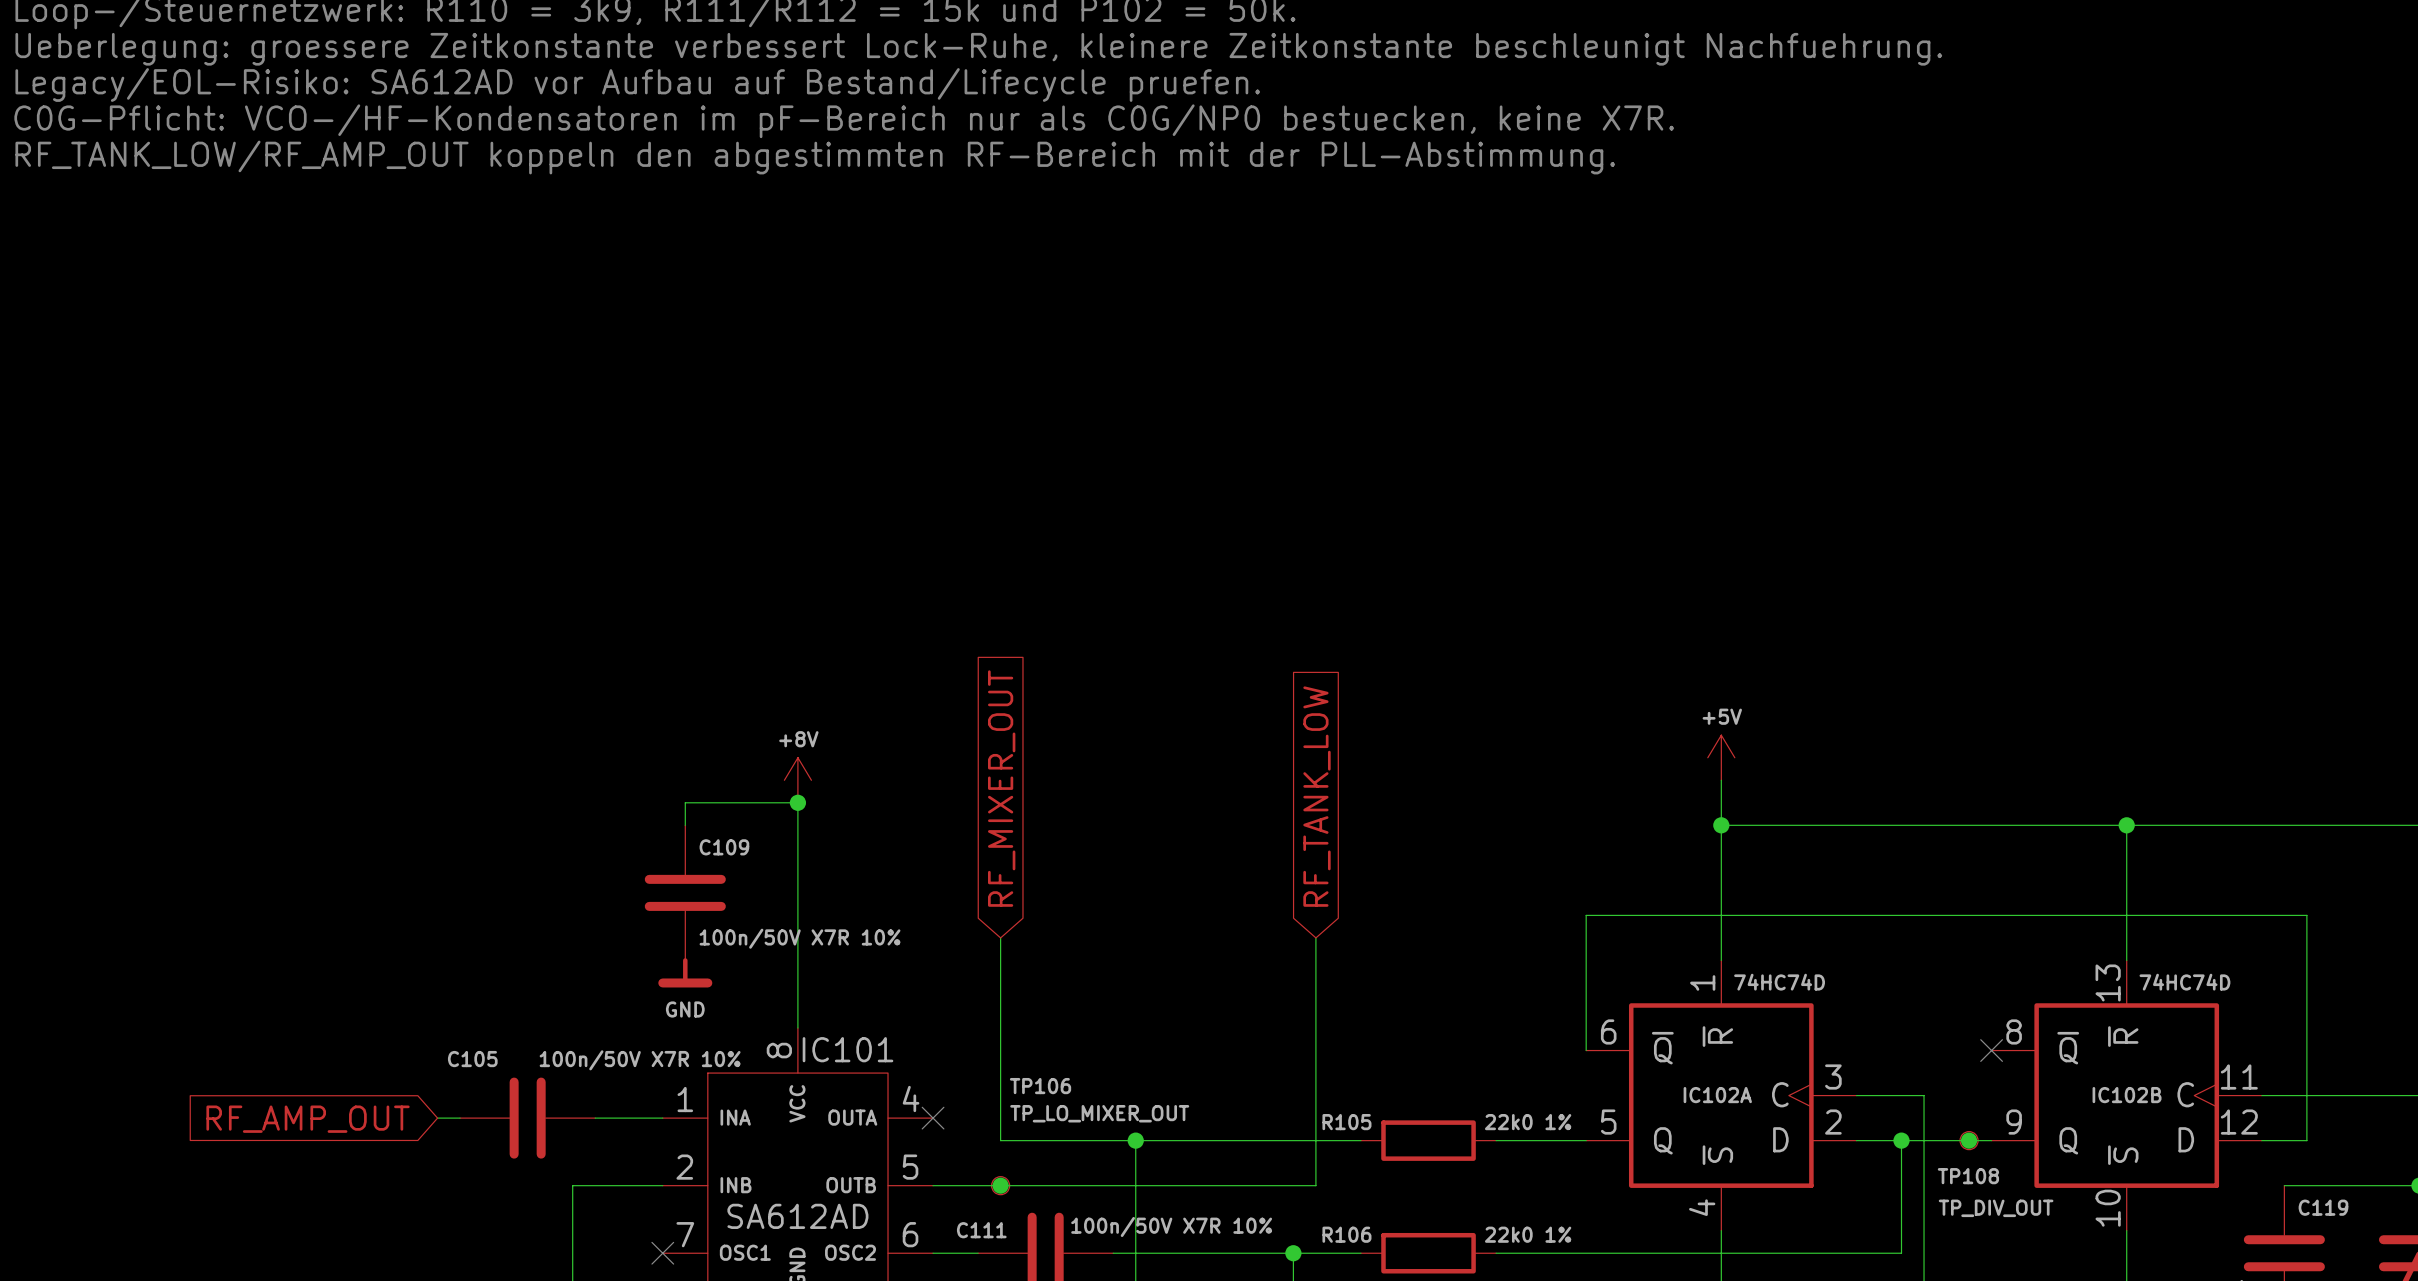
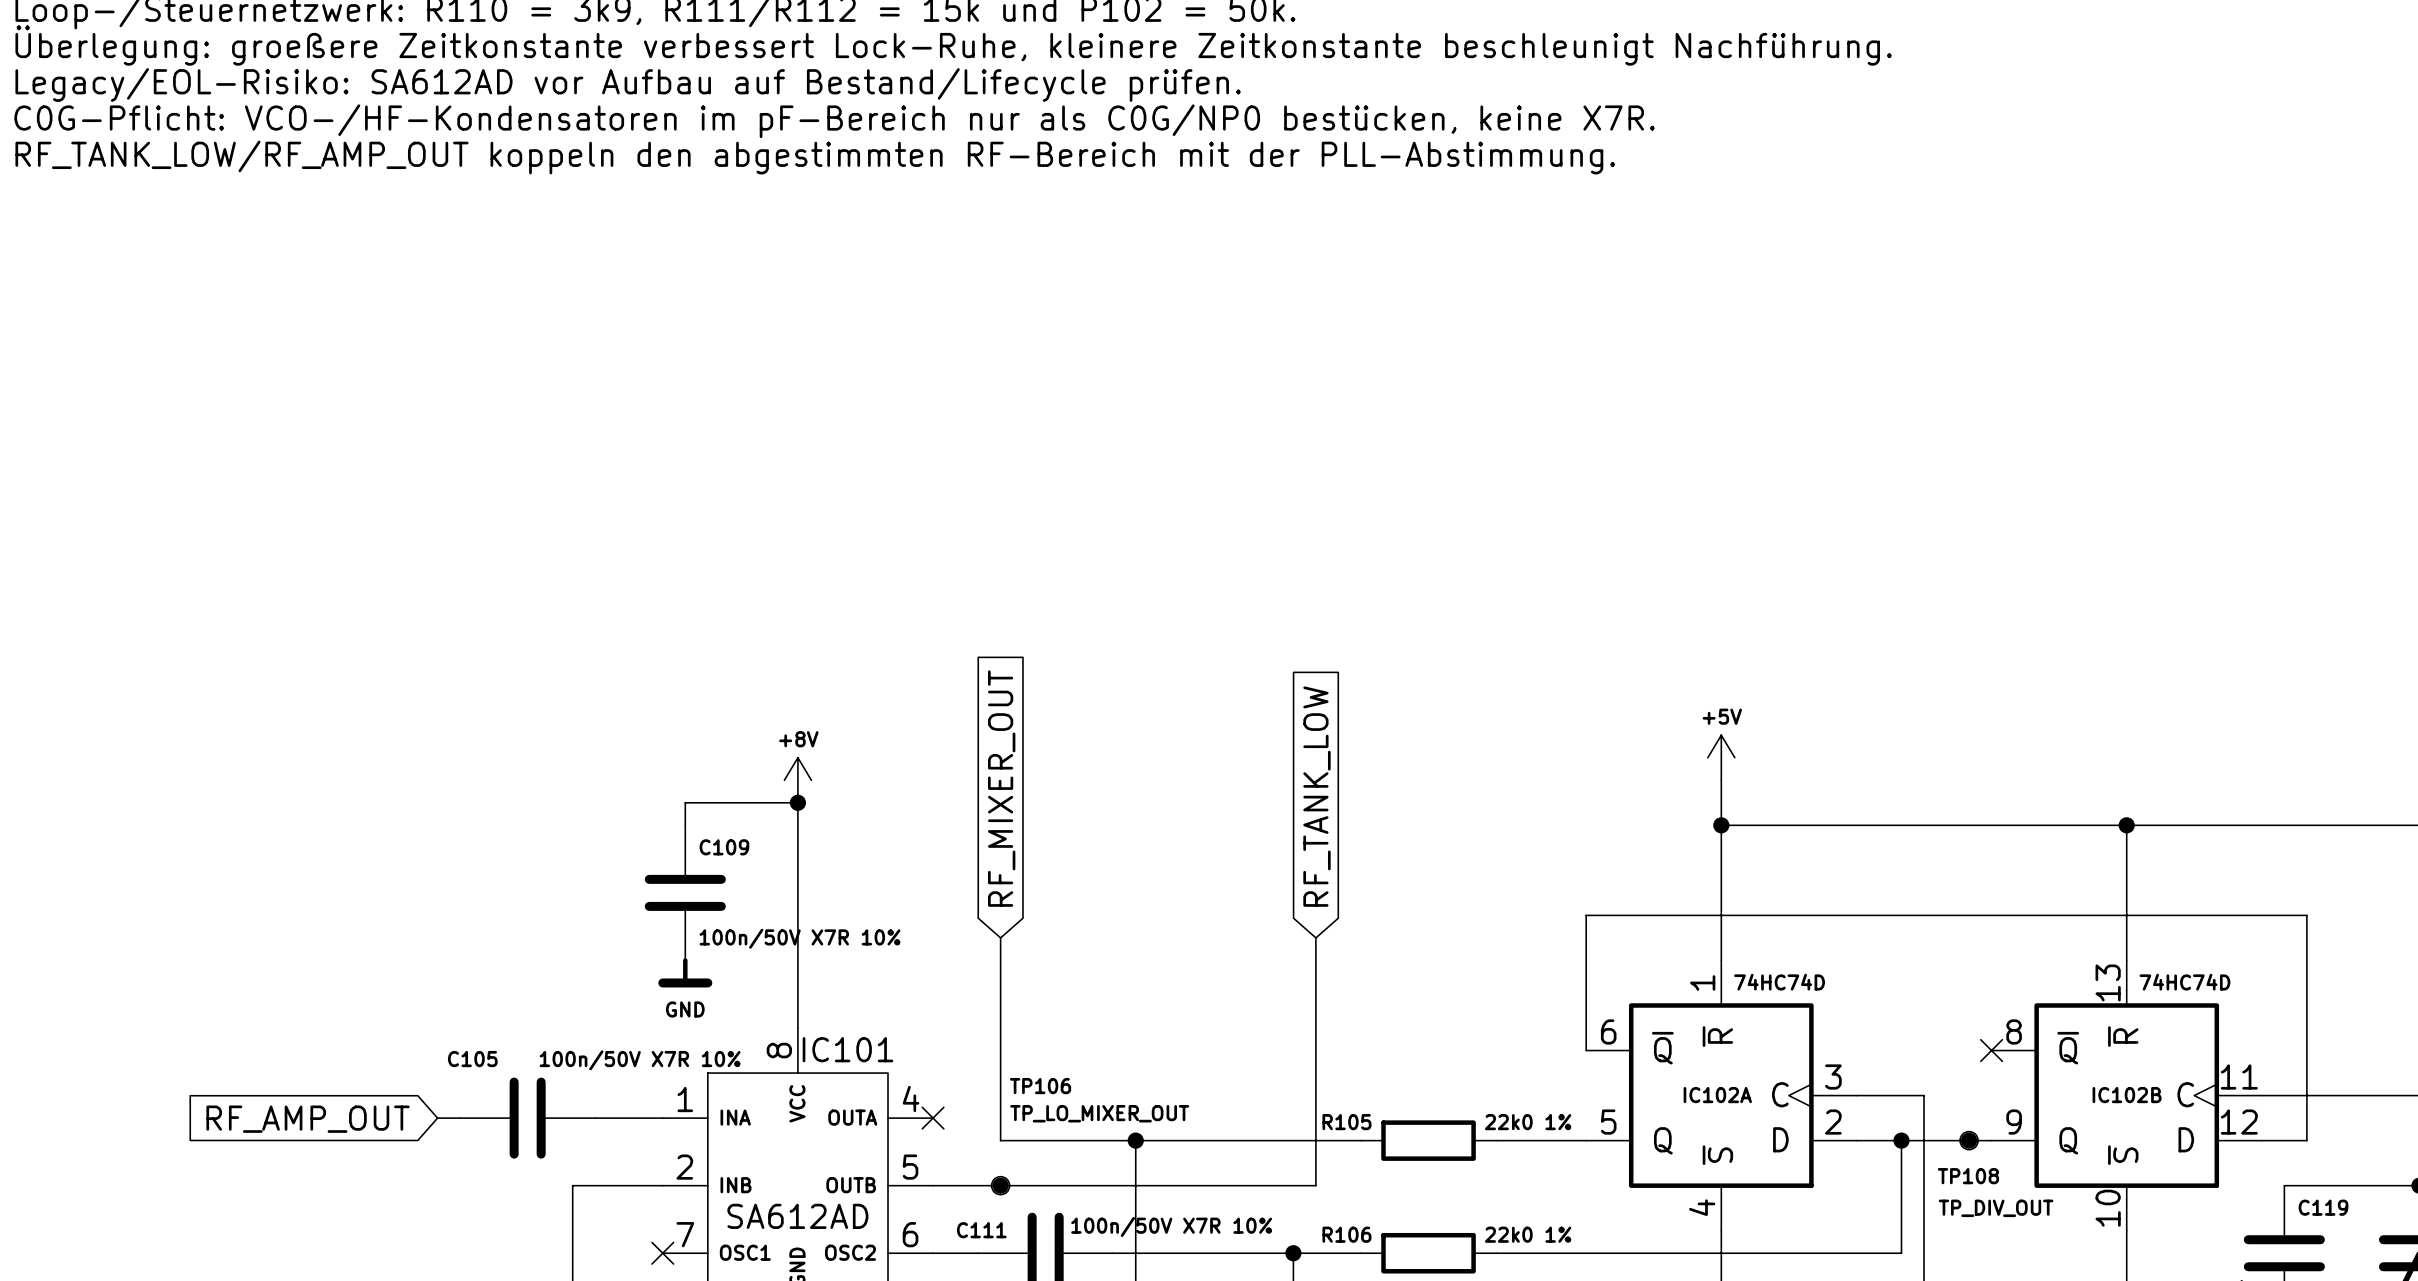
text: Ueberlegung: groessere Zeitkonstante verbessert Lock-Ruhe, kleinere Zeitkonstante beschleunigt Nachfuehrung. (978, 49) -> Überlegung: groeßere Zeitkonstante verbessert Lock-Ruhe, kleinere Zeitkonstante beschleunigt Nachführung. (953, 45)
text: Legacy/EOL-Risiko: SA612AD vor Aufbau auf Bestand/Lifecycle pruefen. (637, 84) -> Legacy/EOL-Risiko: SA612AD vor Aufbau auf Bestand/Lifecycle prüfen. (628, 84)
text: C0G-Pflicht: VCO-/HF-Kondensatoren im pF-Bereich nur als C0G/NP0 bestuecken, keine X7R. (844, 121) -> C0G-Pflicht: VCO-/HF-Kondensatoren im pF-Bereich nur als C0G/NP0 bestücken, keine X7R. (834, 121)

